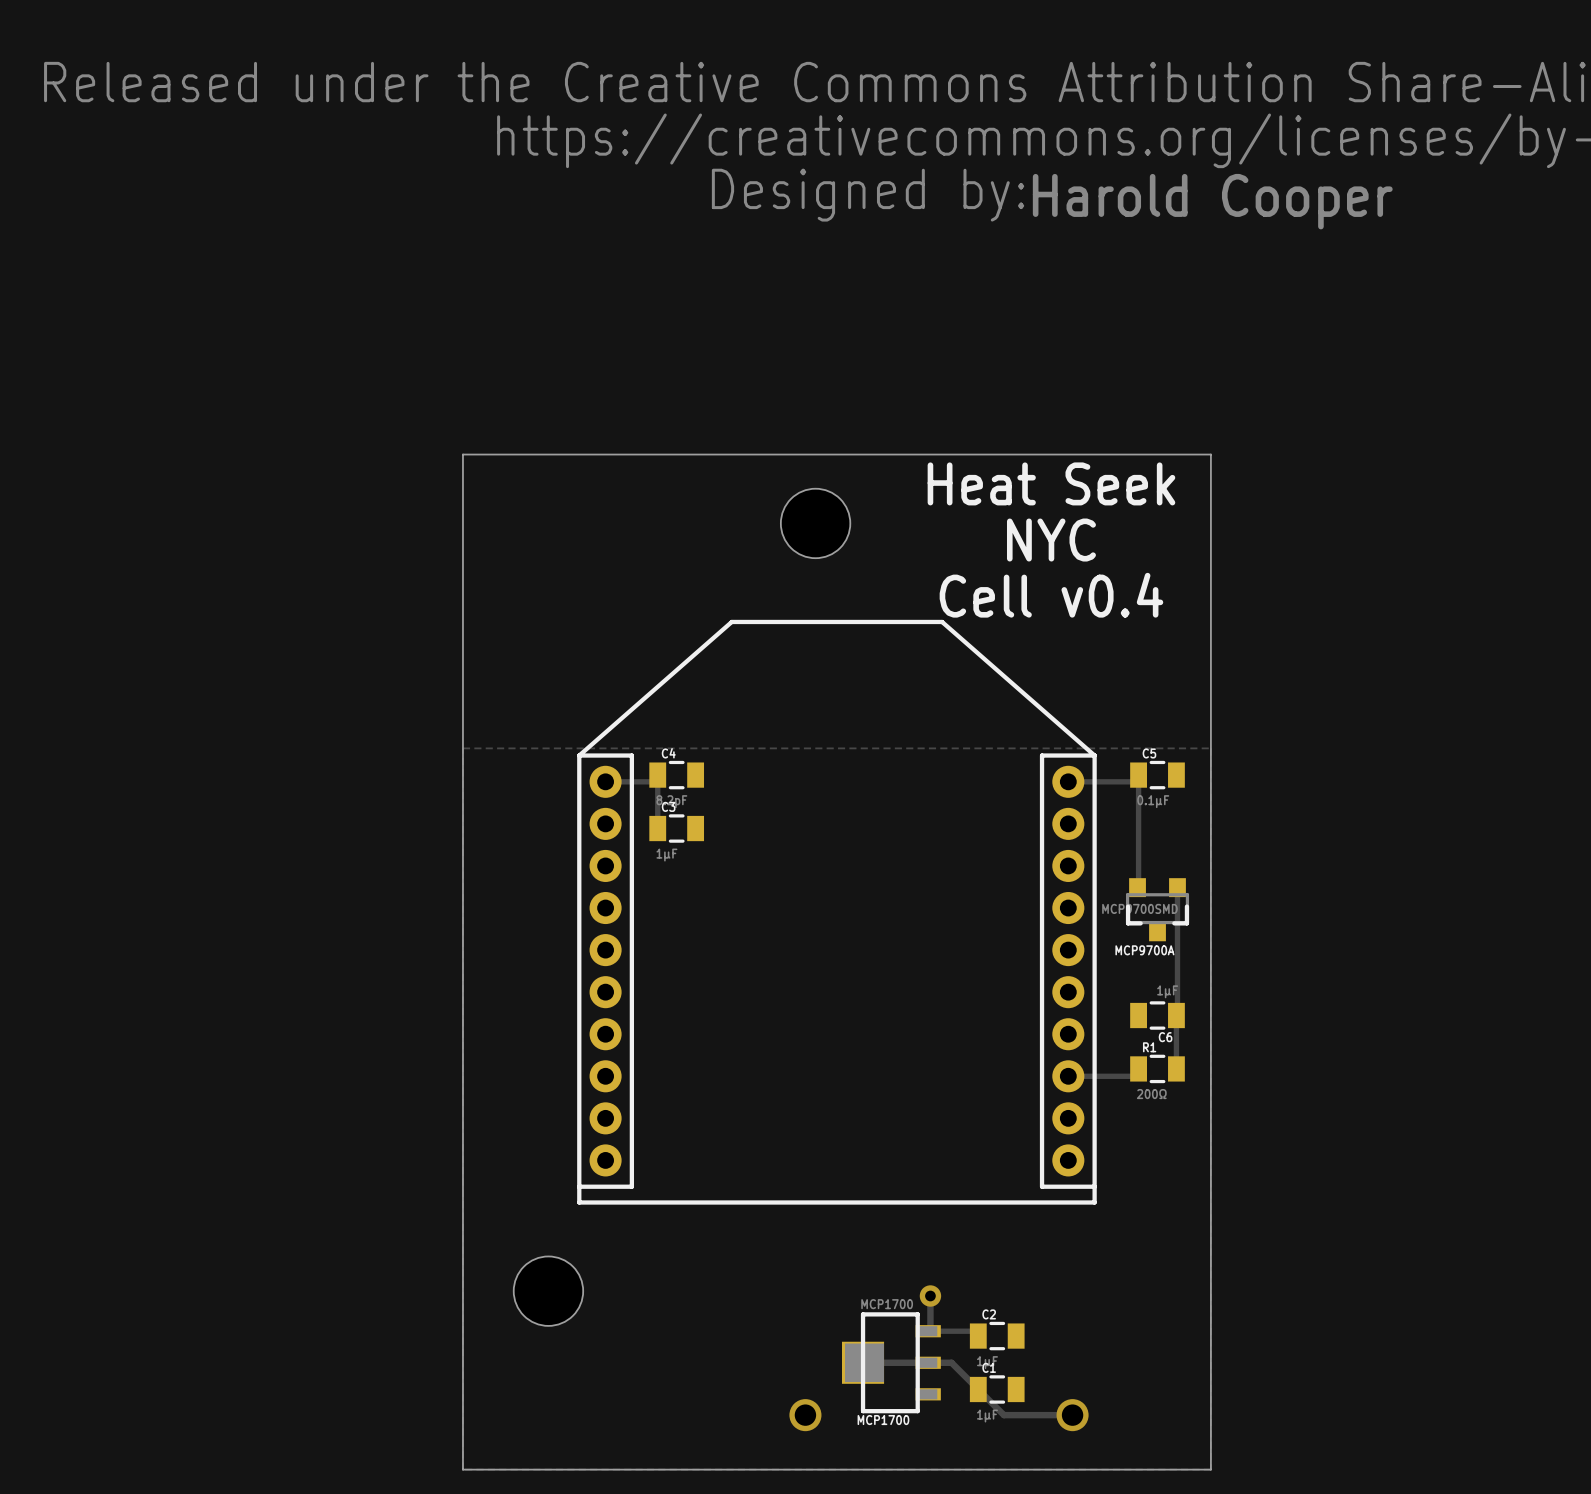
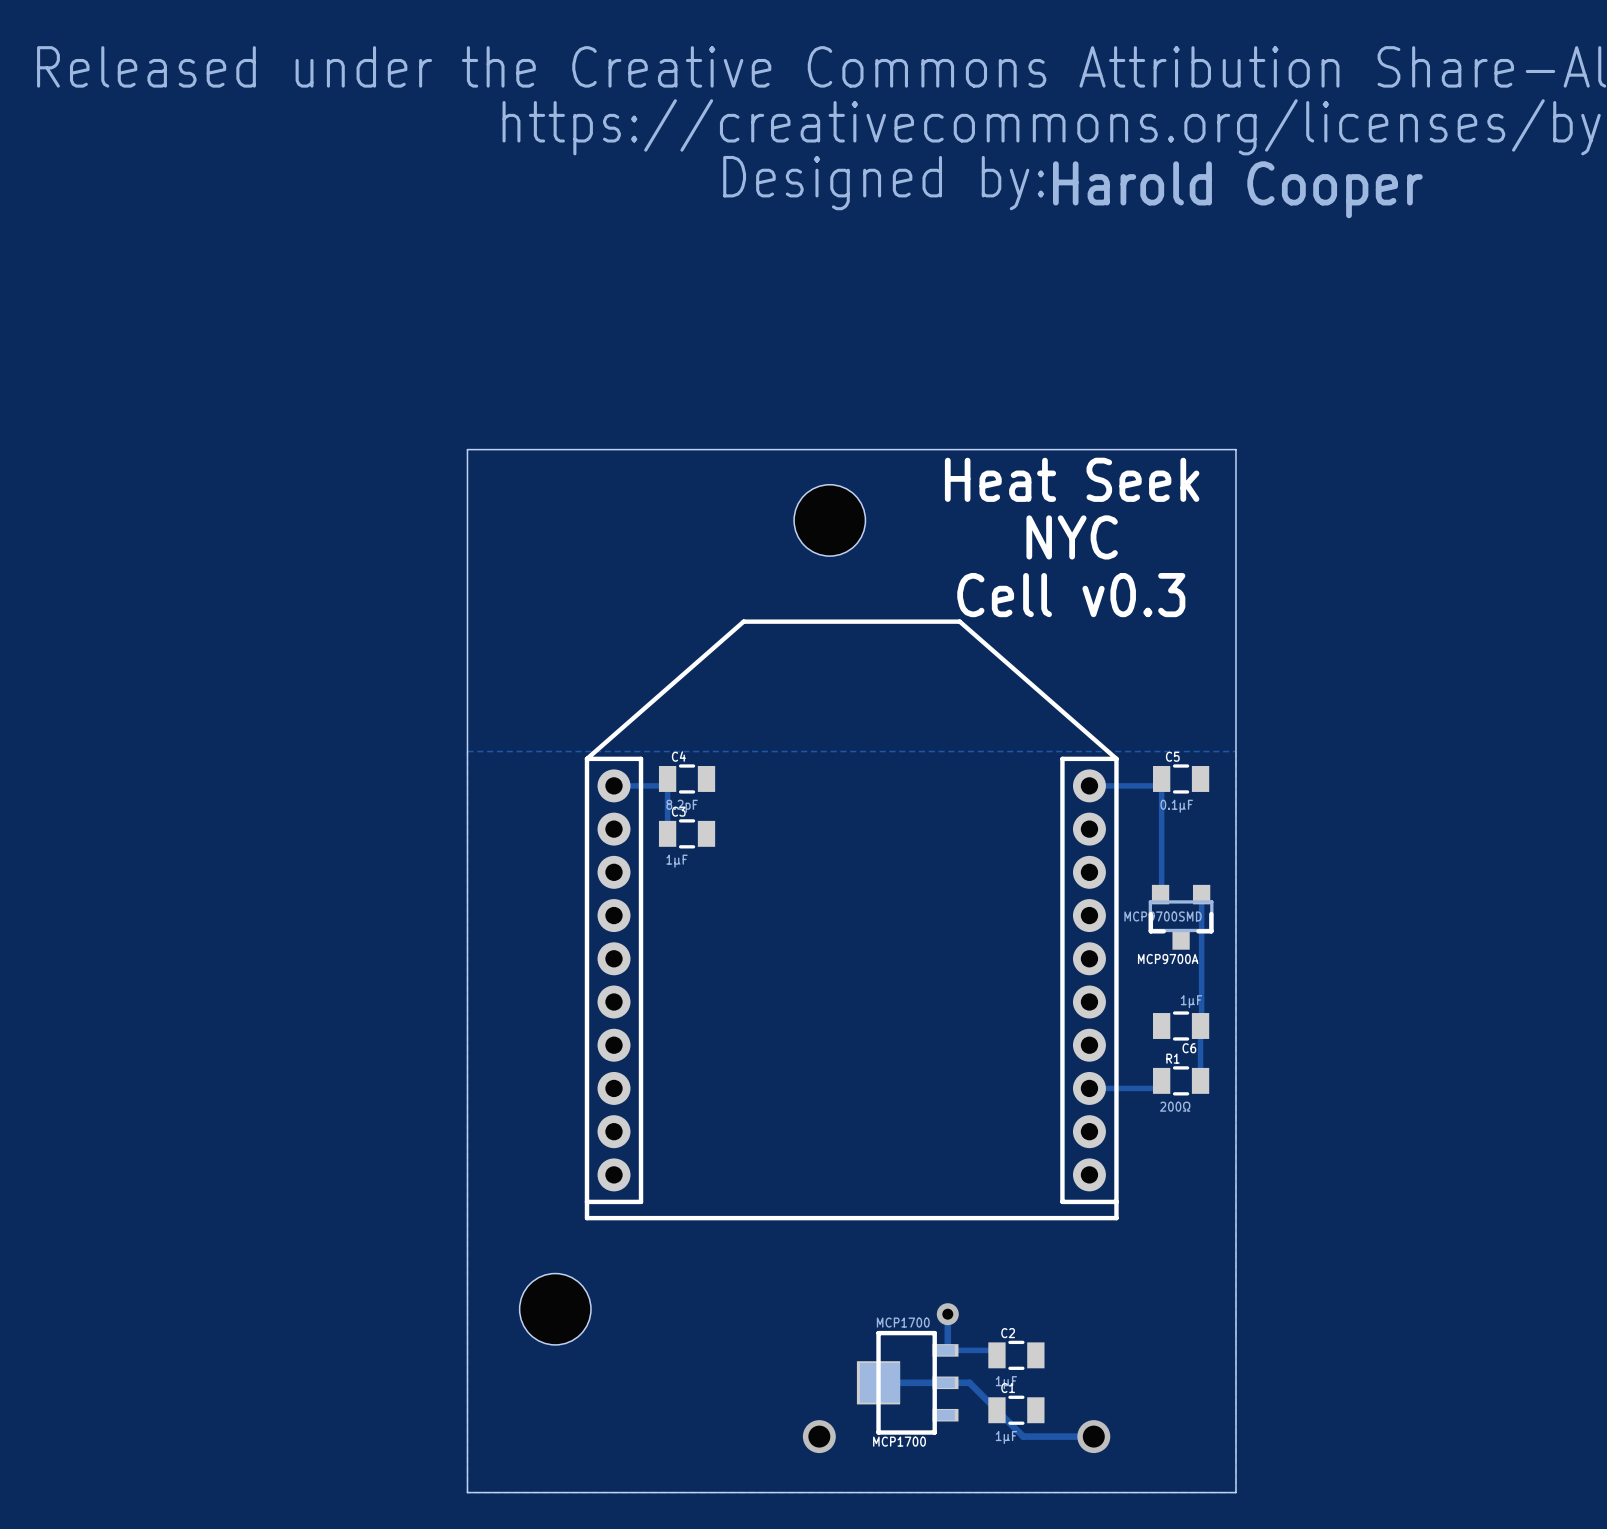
text: Cell v0.4 (1051, 595) -> Cell v0.3 (1071, 595)

